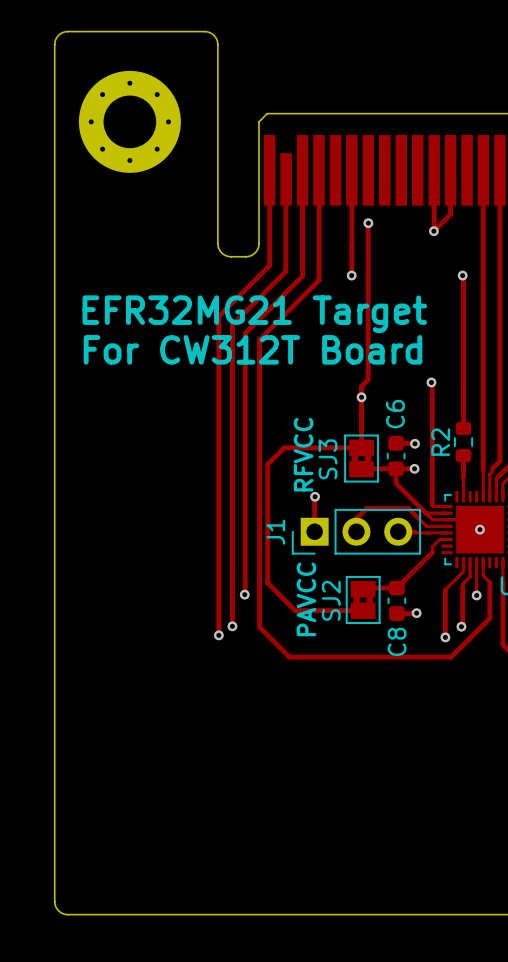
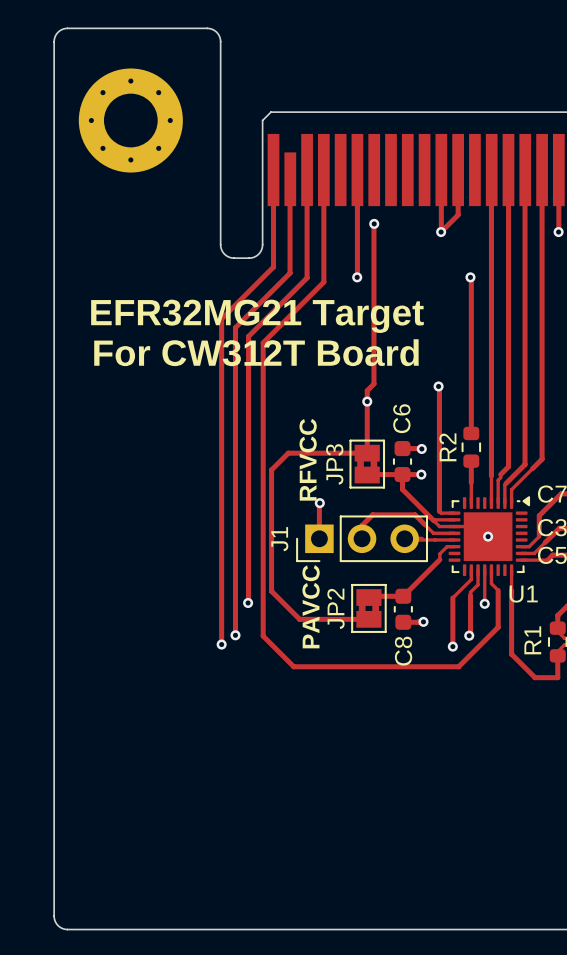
SJ3 name: SJ3 (328, 459) -> JP3 (334, 464)
SJ2 name: SJ2 (331, 600) -> JP2 (335, 608)

